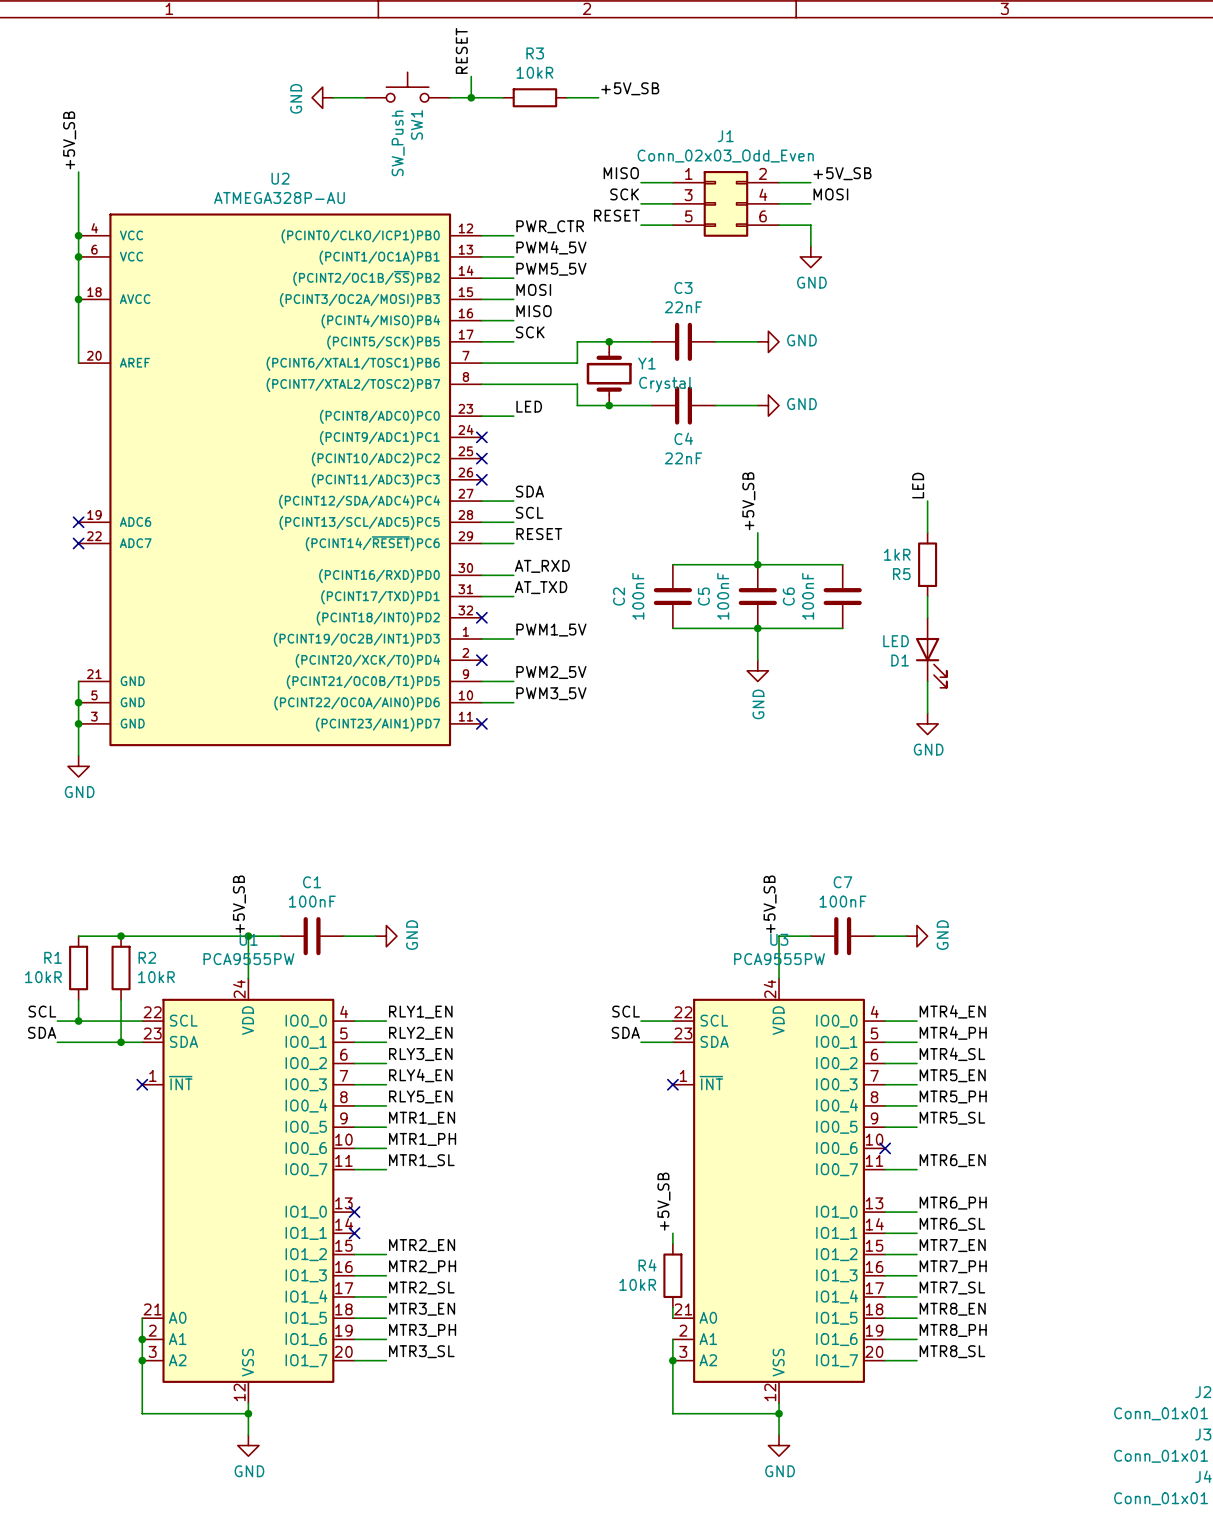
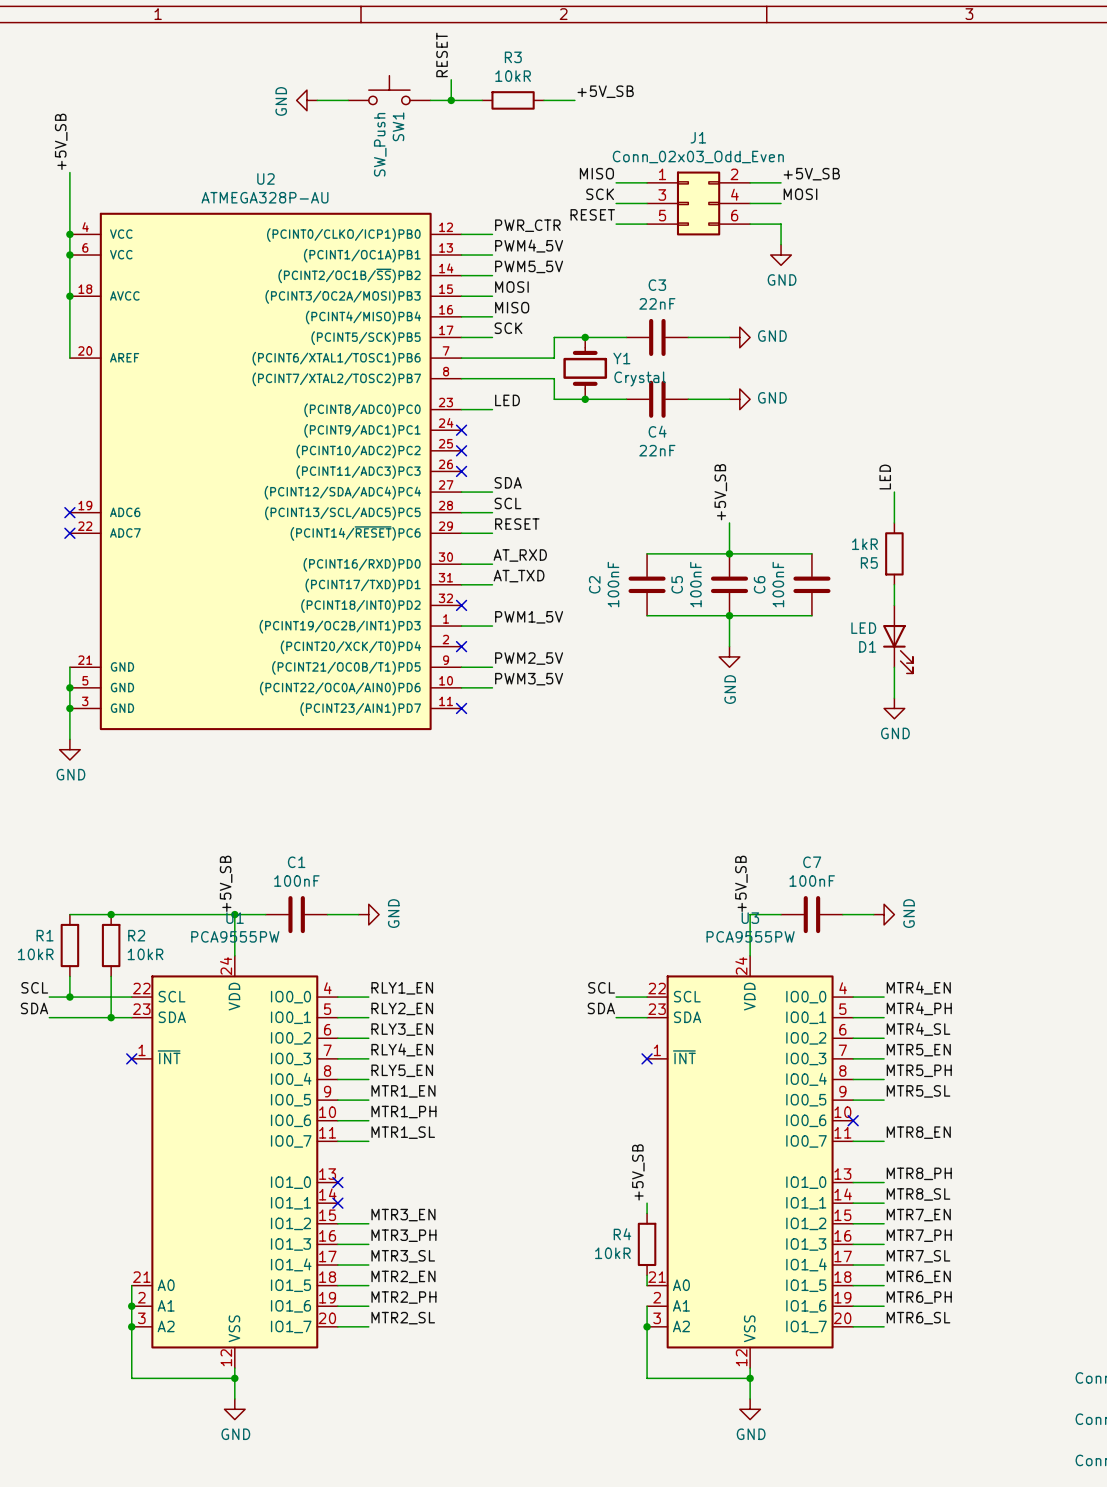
label: MTR6_EN (952, 1160) -> MTR8_EN (918, 1132)
label: MTR6_PH (953, 1203) -> MTR8_PH (919, 1173)
label: MTR6_SL (952, 1224) -> MTR8_SL (918, 1194)
label: MTR2_EN (422, 1245) -> MTR3_EN (403, 1215)
label: MTR2_PH (422, 1266) -> MTR3_PH (403, 1235)
label: MTR2_SL (421, 1288) -> MTR3_SL (403, 1256)
label: MTR3_EN (422, 1309) -> MTR2_EN (403, 1276)
label: MTR8_EN (952, 1309) -> MTR6_EN (918, 1276)
label: MTR3_PH (422, 1330) -> MTR2_PH (403, 1297)
label: MTR8_PH (953, 1330) -> MTR6_PH (919, 1297)
label: MTR3_SL (421, 1351) -> MTR2_SL (403, 1318)
label: MTR8_SL (952, 1351) -> MTR6_SL (918, 1318)

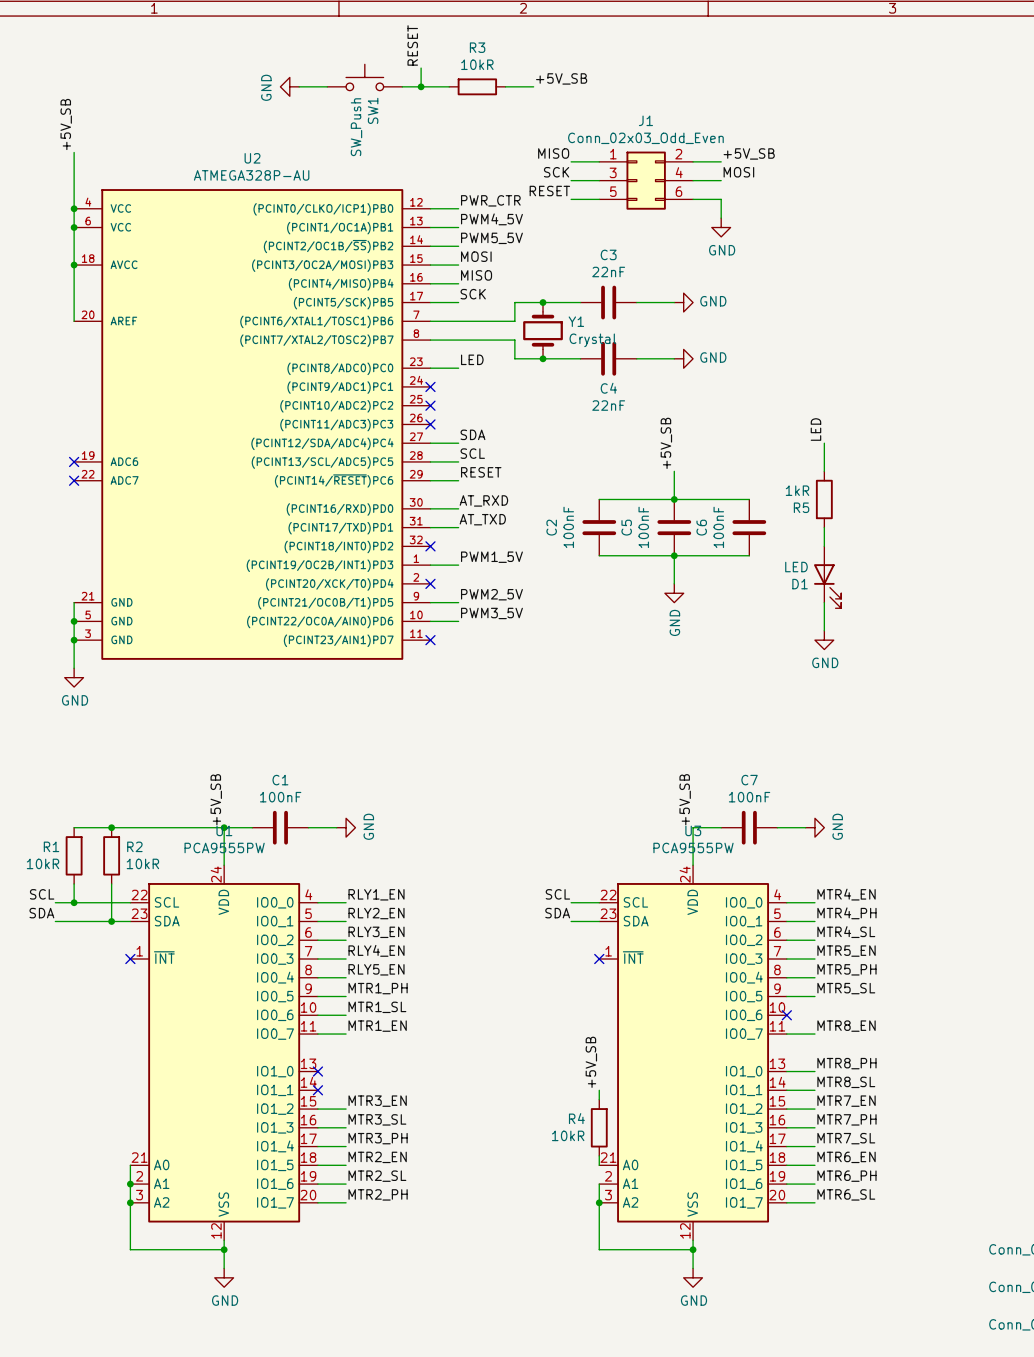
label: MTR1_EN (403, 1091) -> MTR1_PH (378, 988)
label: MTR1_PH (403, 1112) -> MTR1_SL (377, 1007)
label: MTR1_SL (403, 1132) -> MTR1_EN (377, 1026)
label: MTR3_PH (403, 1235) -> MTR3_SL (377, 1119)
label: MTR3_SL (403, 1256) -> MTR3_PH (378, 1138)
label: MTR2_PH (403, 1297) -> MTR2_SL (377, 1176)
label: MTR2_SL (403, 1318) -> MTR2_PH (378, 1194)

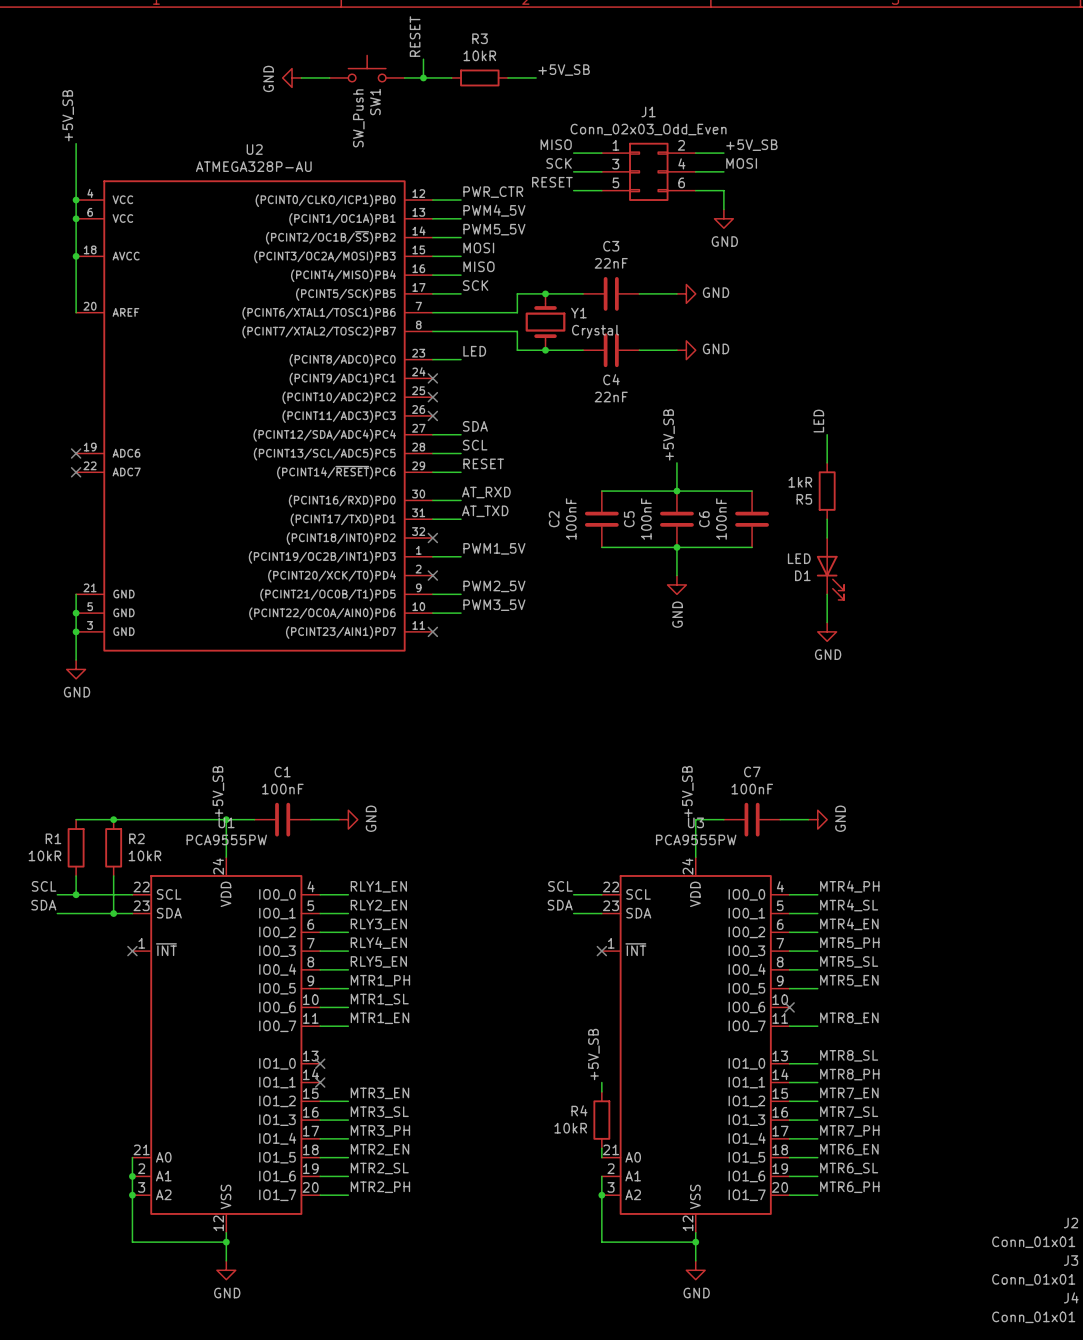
label: MTR4_EN (846, 894) -> MTR4_PH (849, 886)
label: MTR4_PH (846, 913) -> MTR4_SL (849, 905)
label: MTR4_SL (846, 932) -> MTR4_EN (849, 924)
label: MTR5_EN (846, 951) -> MTR5_PH (849, 943)
label: MTR5_PH (846, 969) -> MTR5_SL (849, 961)
label: MTR5_SL (846, 988) -> MTR5_EN (849, 980)
label: MTR8_PH (846, 1063) -> MTR8_SL (849, 1055)
label: MTR8_SL (846, 1082) -> MTR8_PH (849, 1074)
label: MTR7_PH (846, 1119) -> MTR7_SL (849, 1112)
label: MTR7_SL (846, 1138) -> MTR7_PH (849, 1130)
label: MTR6_PH (846, 1176) -> MTR6_SL (849, 1168)
label: MTR6_SL (846, 1194) -> MTR6_PH (849, 1187)

